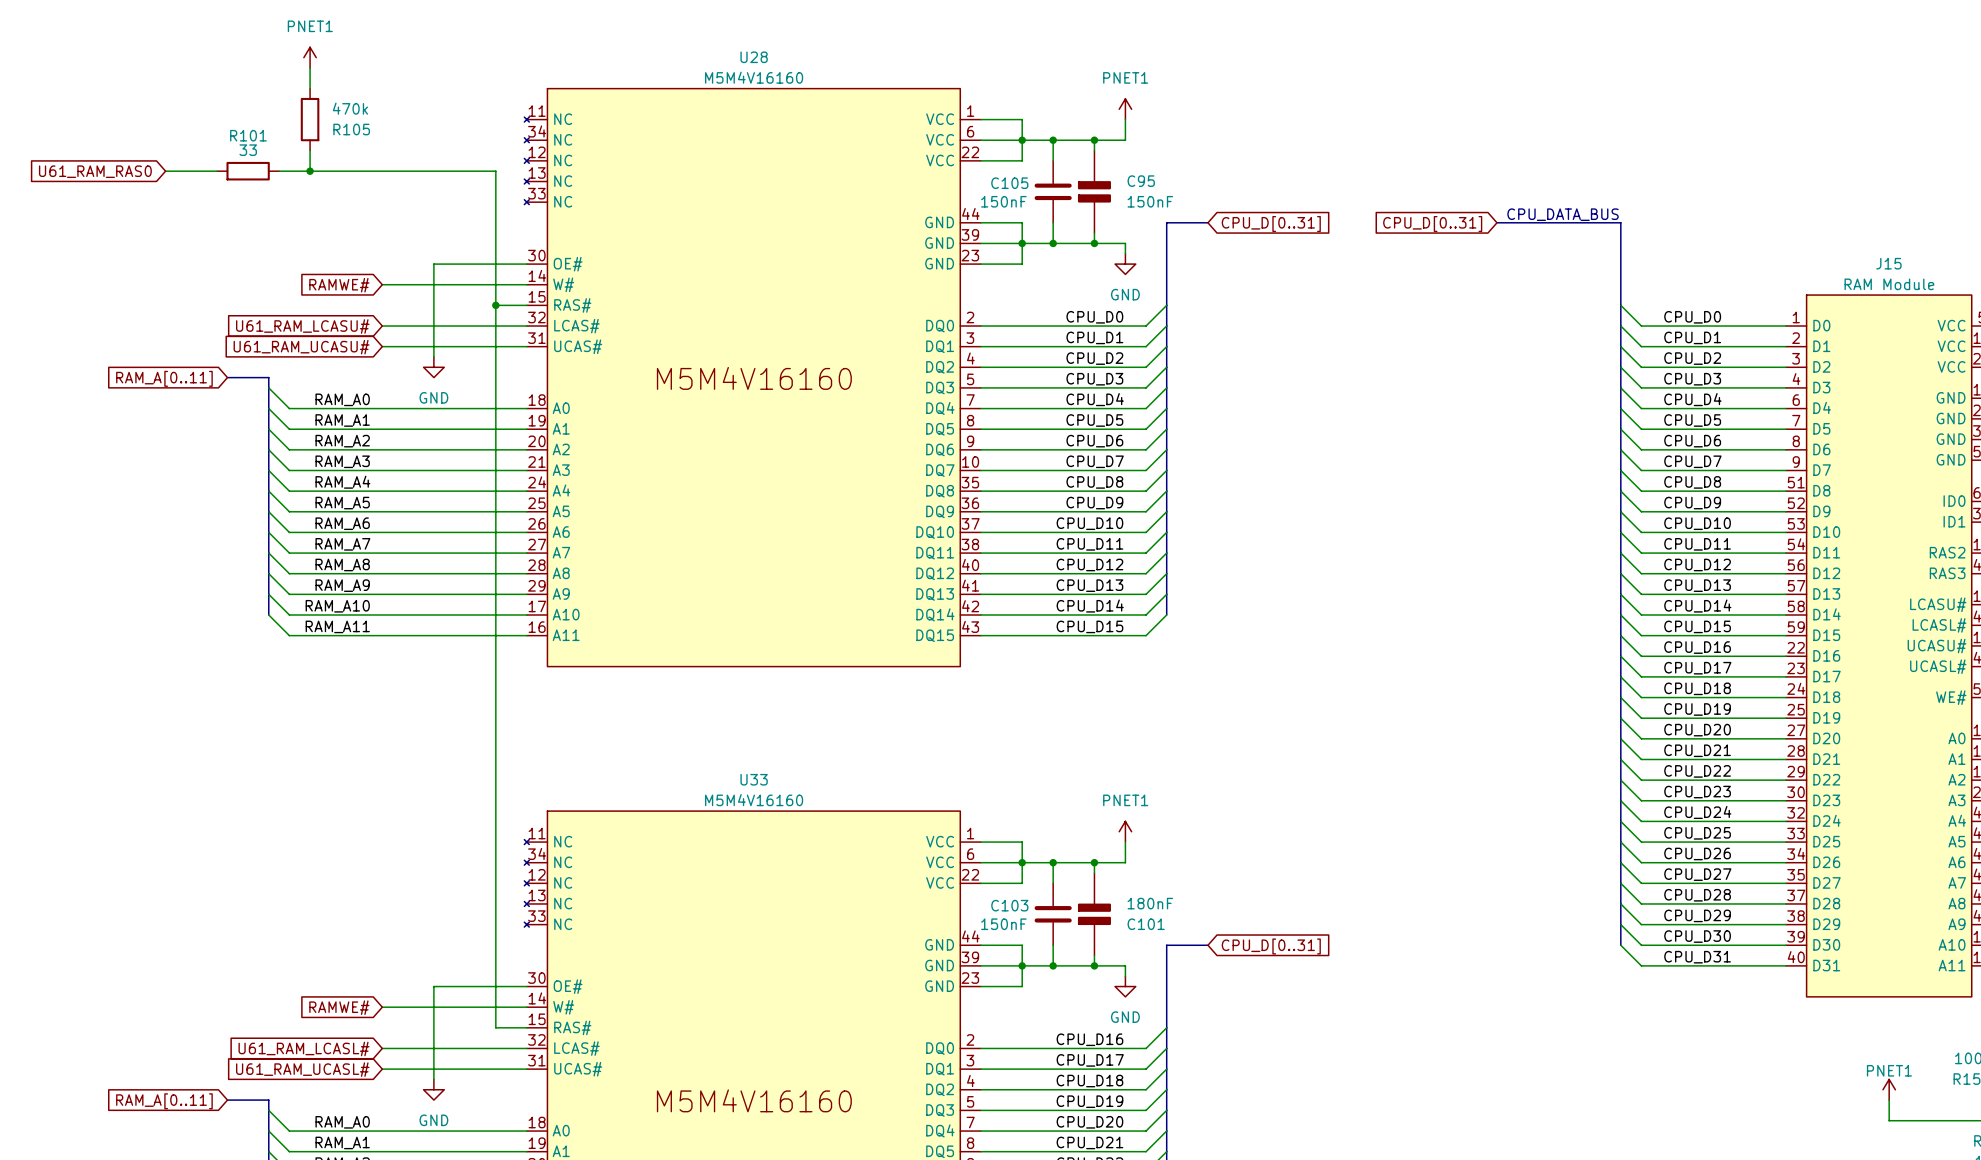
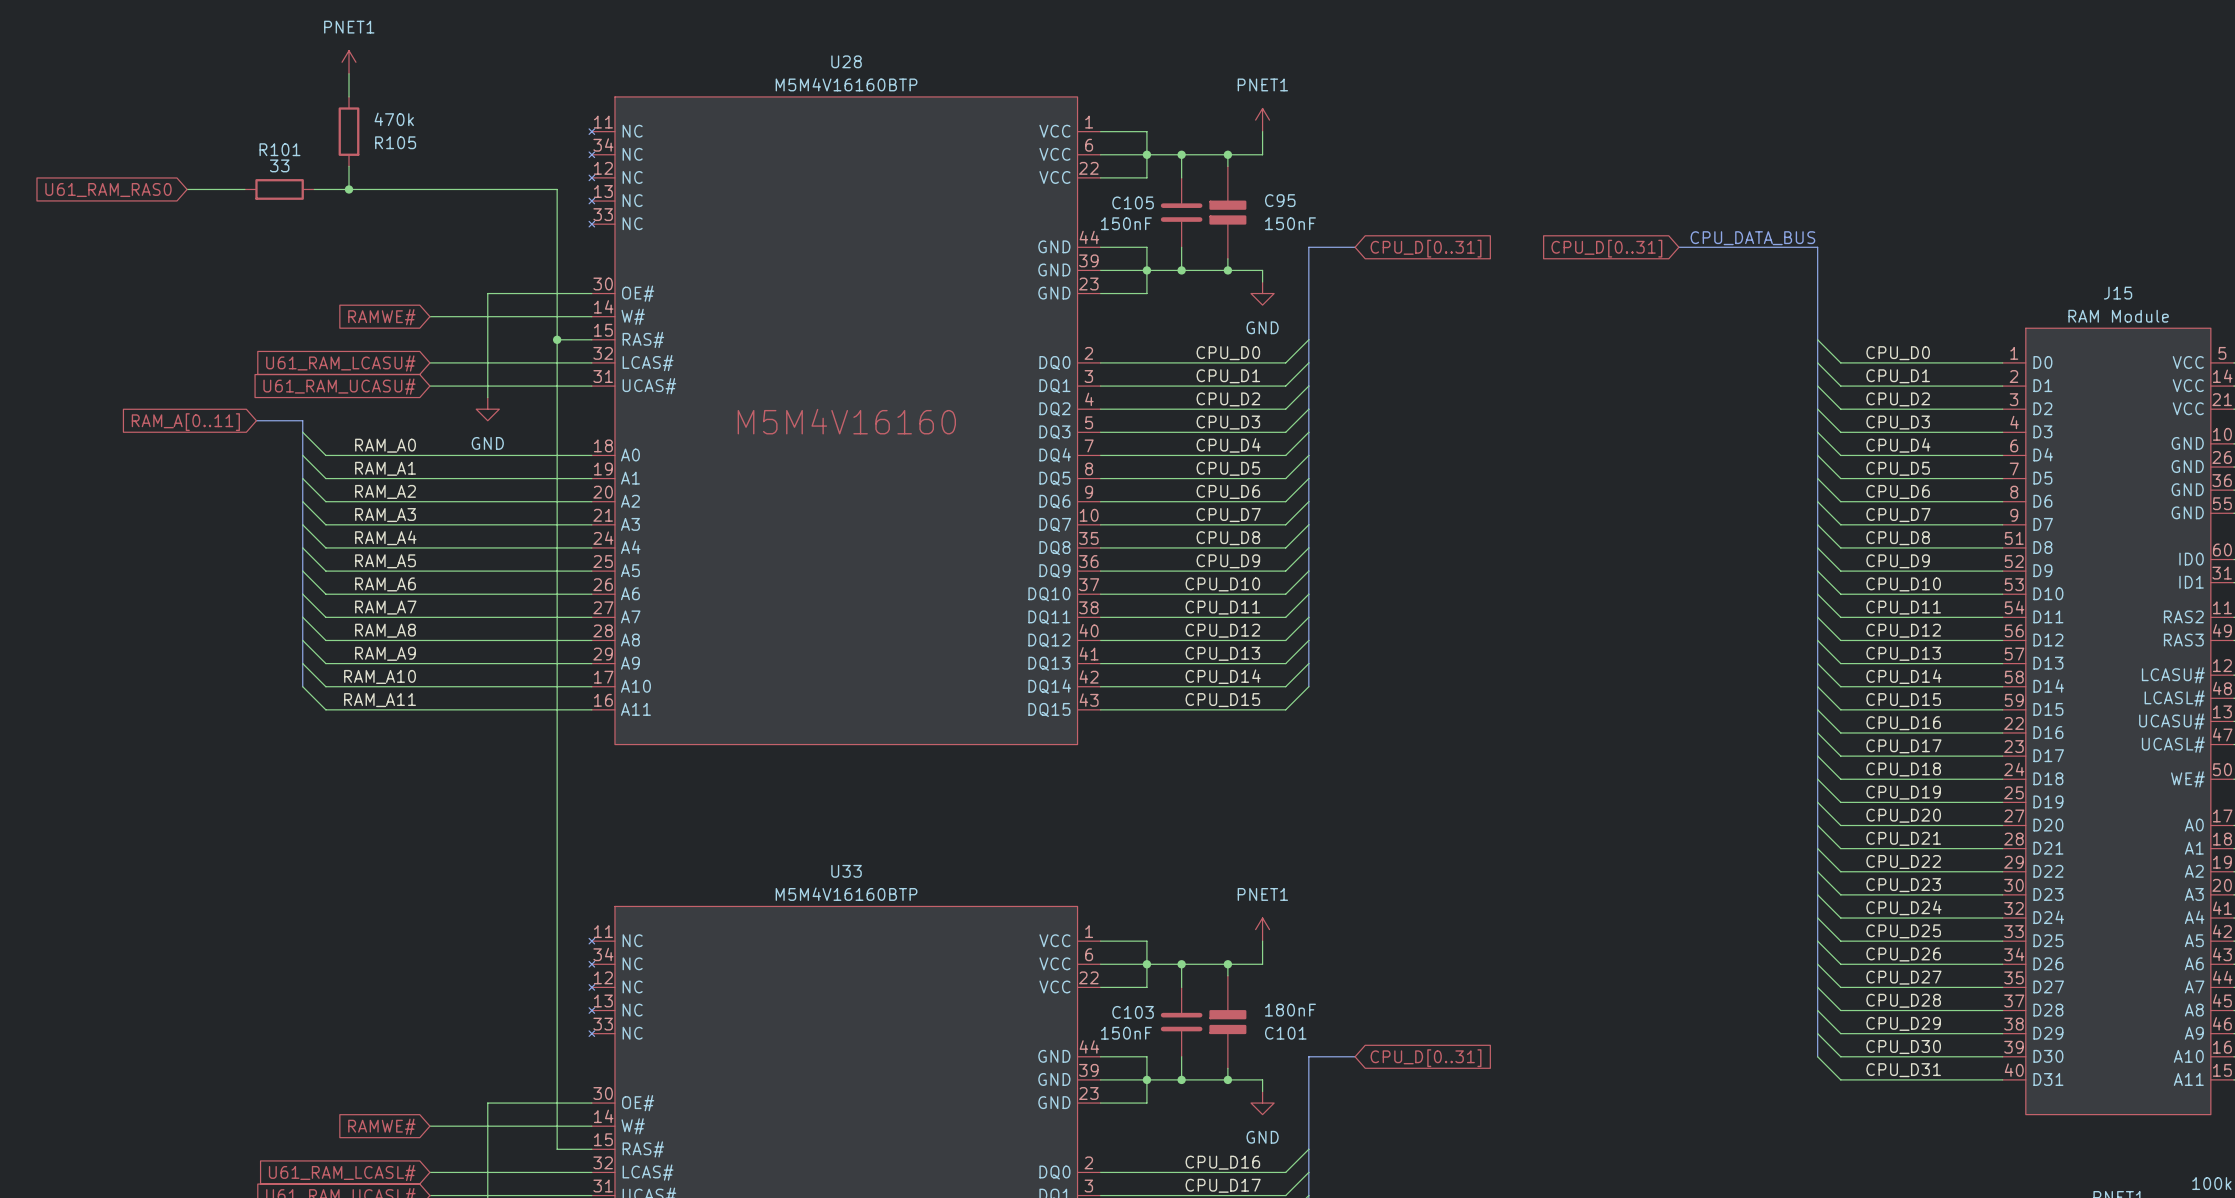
U28 value: M5M4V16160 (754, 77) -> M5M4V16160BTP (846, 84)
U33 value: M5M4V16160 (754, 800) -> M5M4V16160BTP (846, 894)

